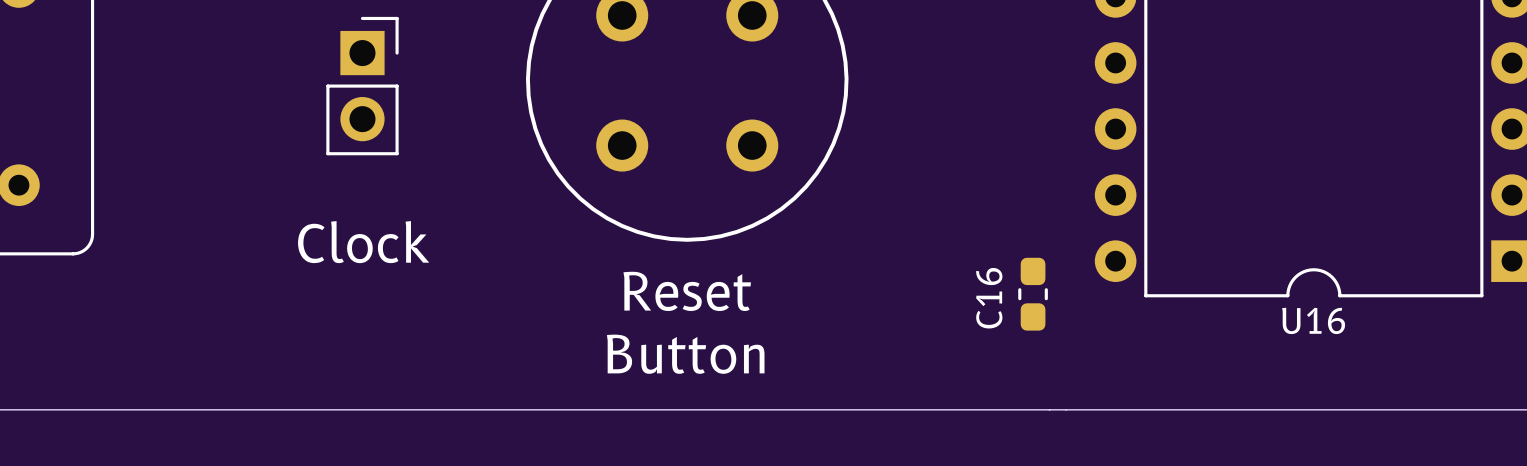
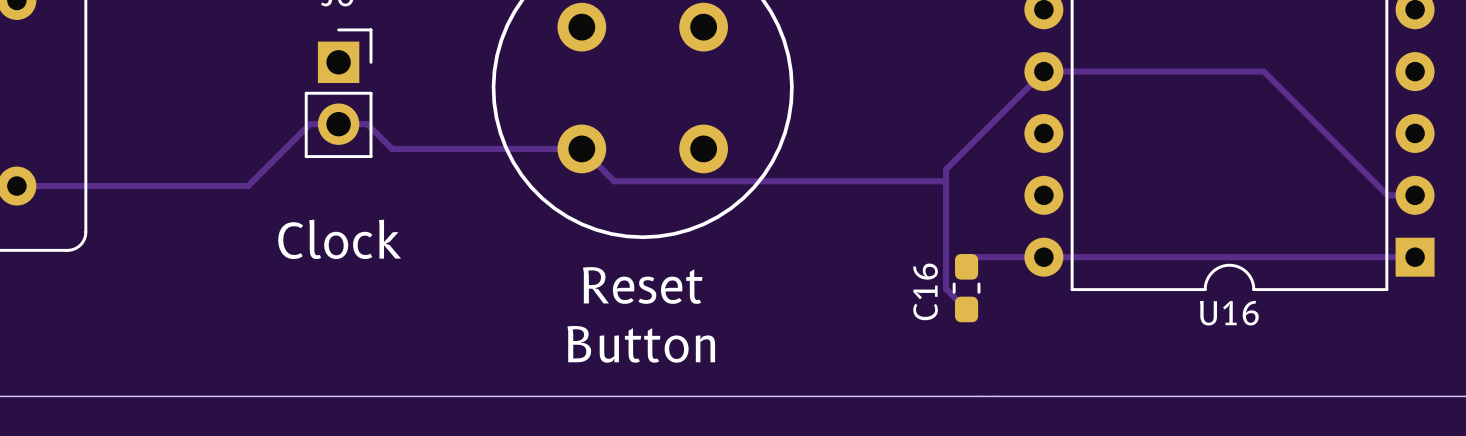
track: none -> (946, 181) (614, 181) (581, 148) (391, 148) (367, 124) (309, 124) (248, 186) (16, 186)
track: none -> (1415, 195) (1387, 195) (1263, 71) (1043, 71) (946, 169) (946, 288) (966, 309)
track: none -> (1415, 257) (976, 257) (966, 266)

